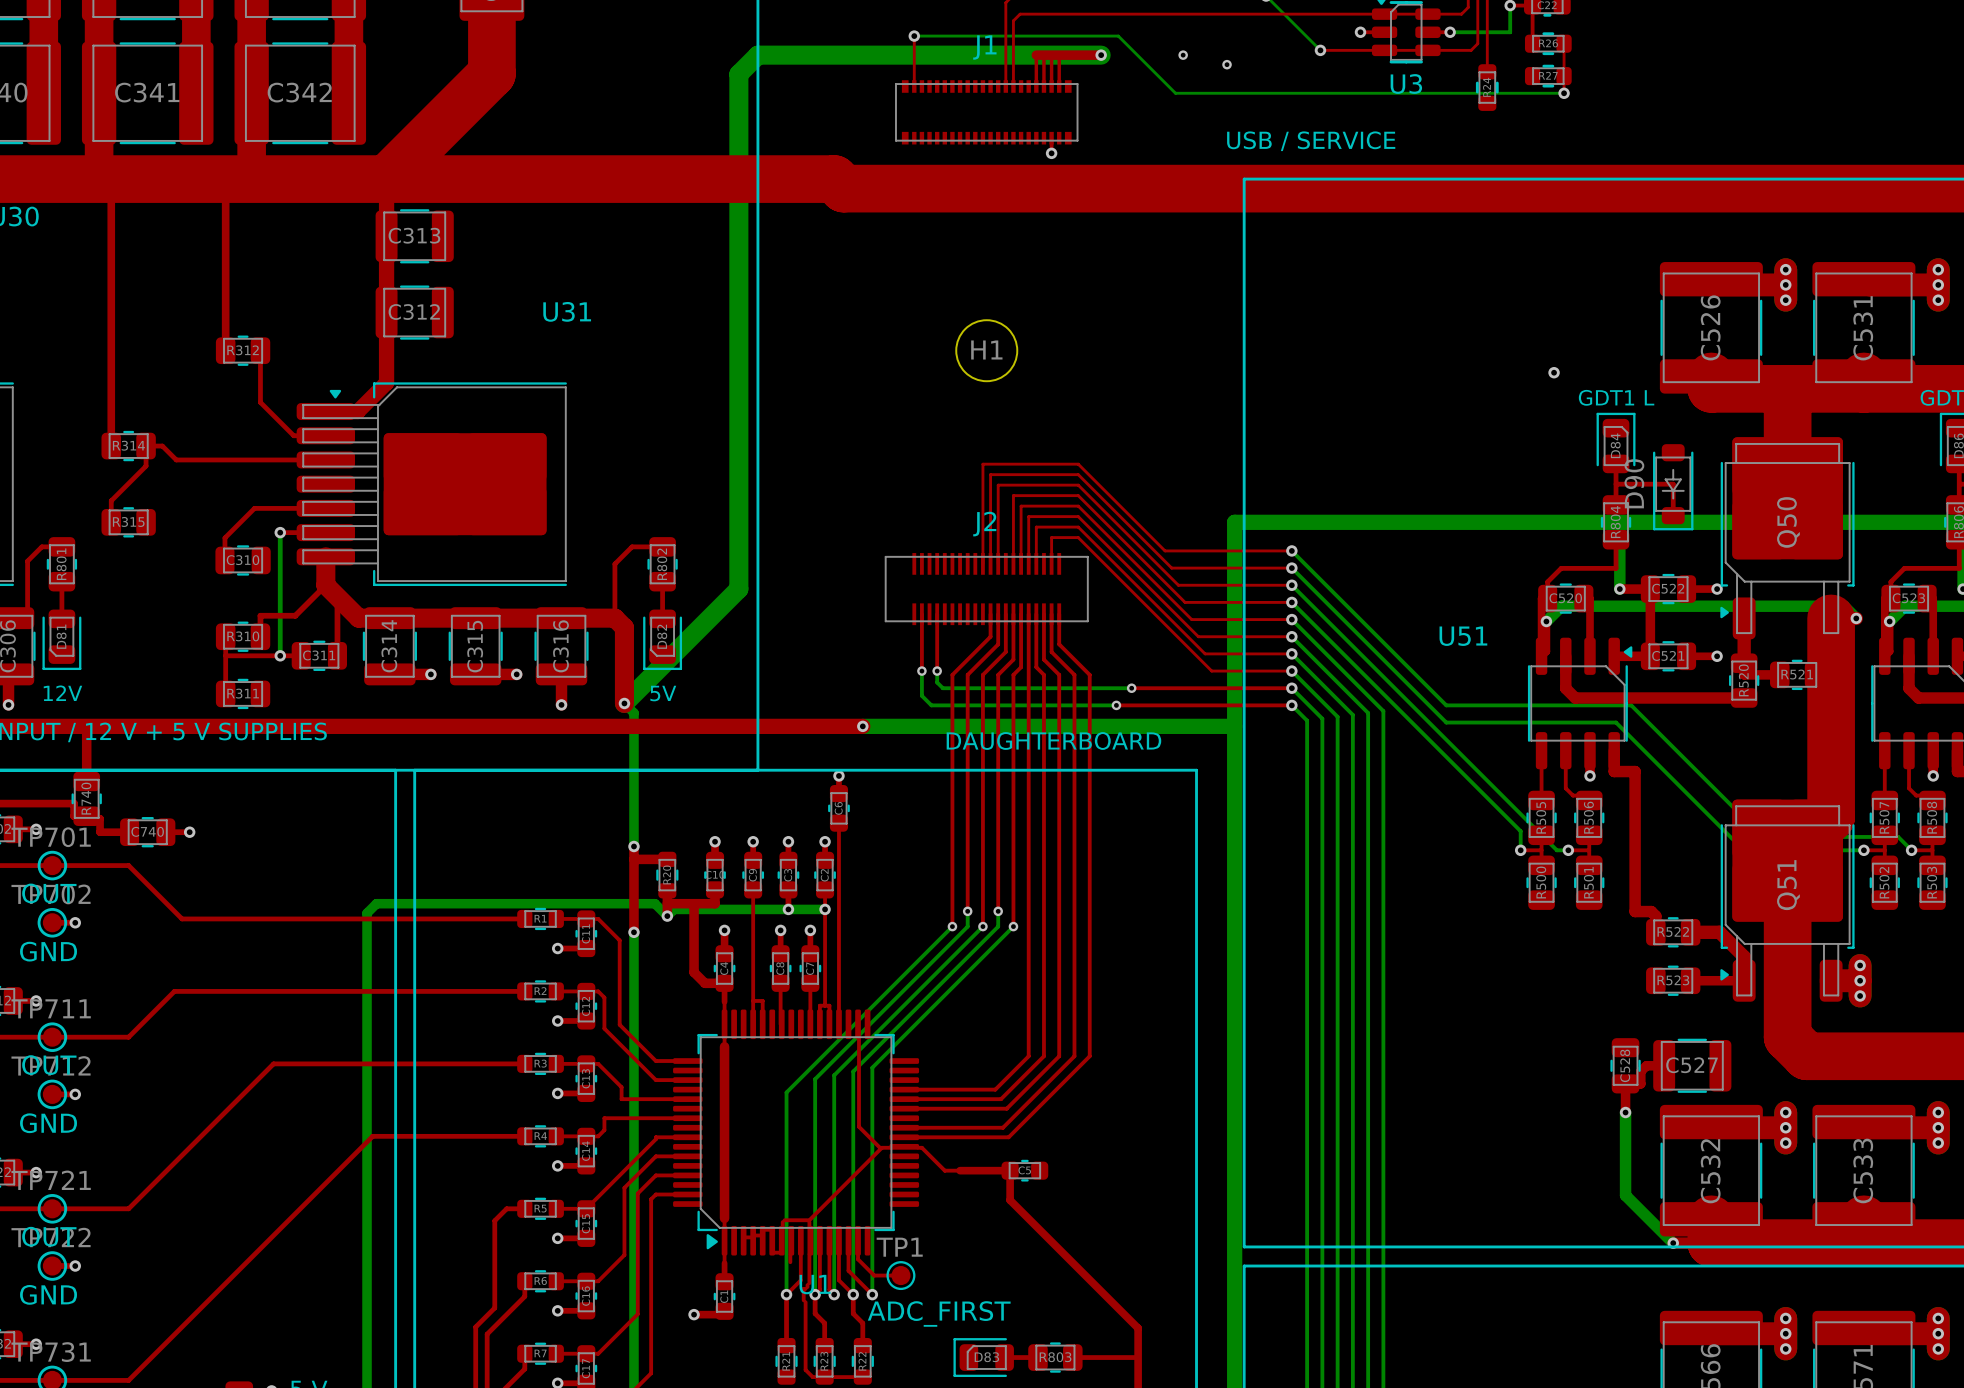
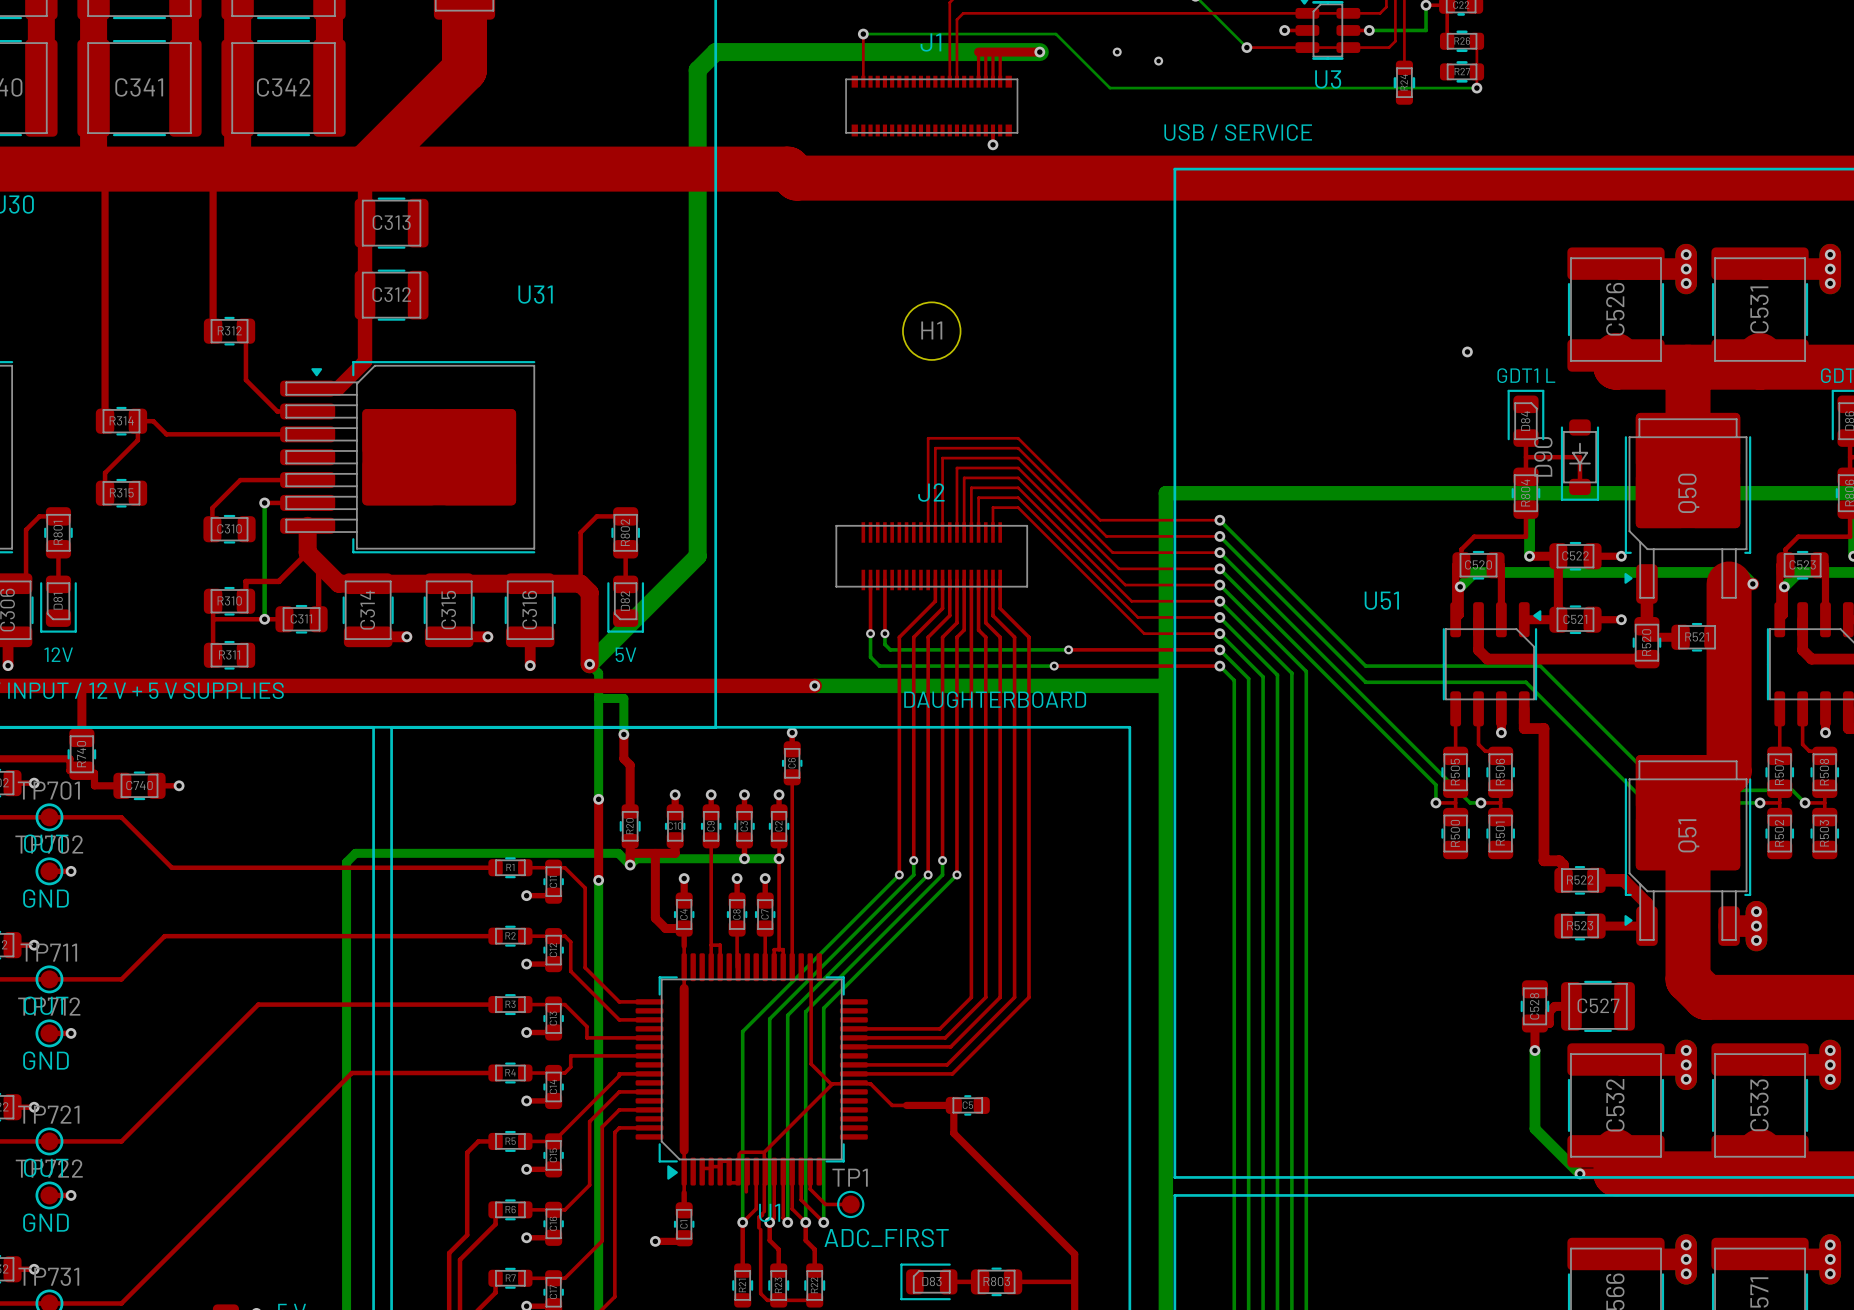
bottom track: none -> (598, 698) (623, 698) (623, 734)
via: none -> (623, 734)
top track: (633, 859) (667, 859) -> (623, 734) (623, 758) (630, 765) (630, 811)

